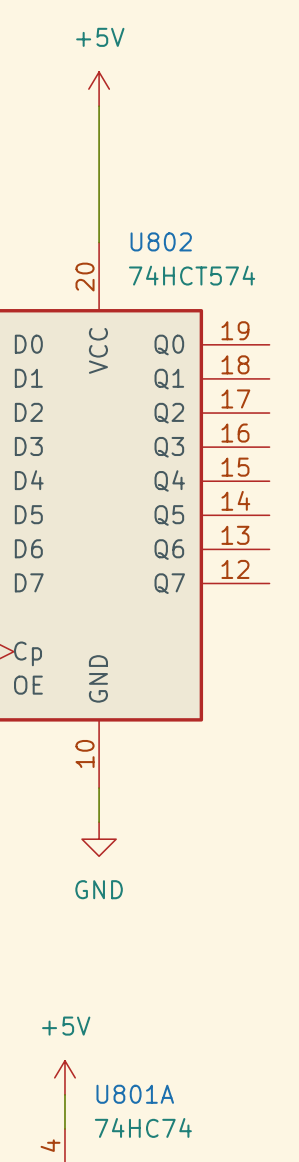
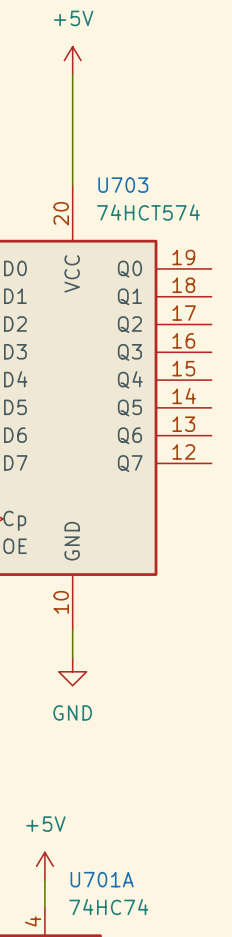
U802 name: U802 (161, 241) -> U703 (123, 185)
U801A name: U801A (135, 1094) -> U701A (102, 879)

